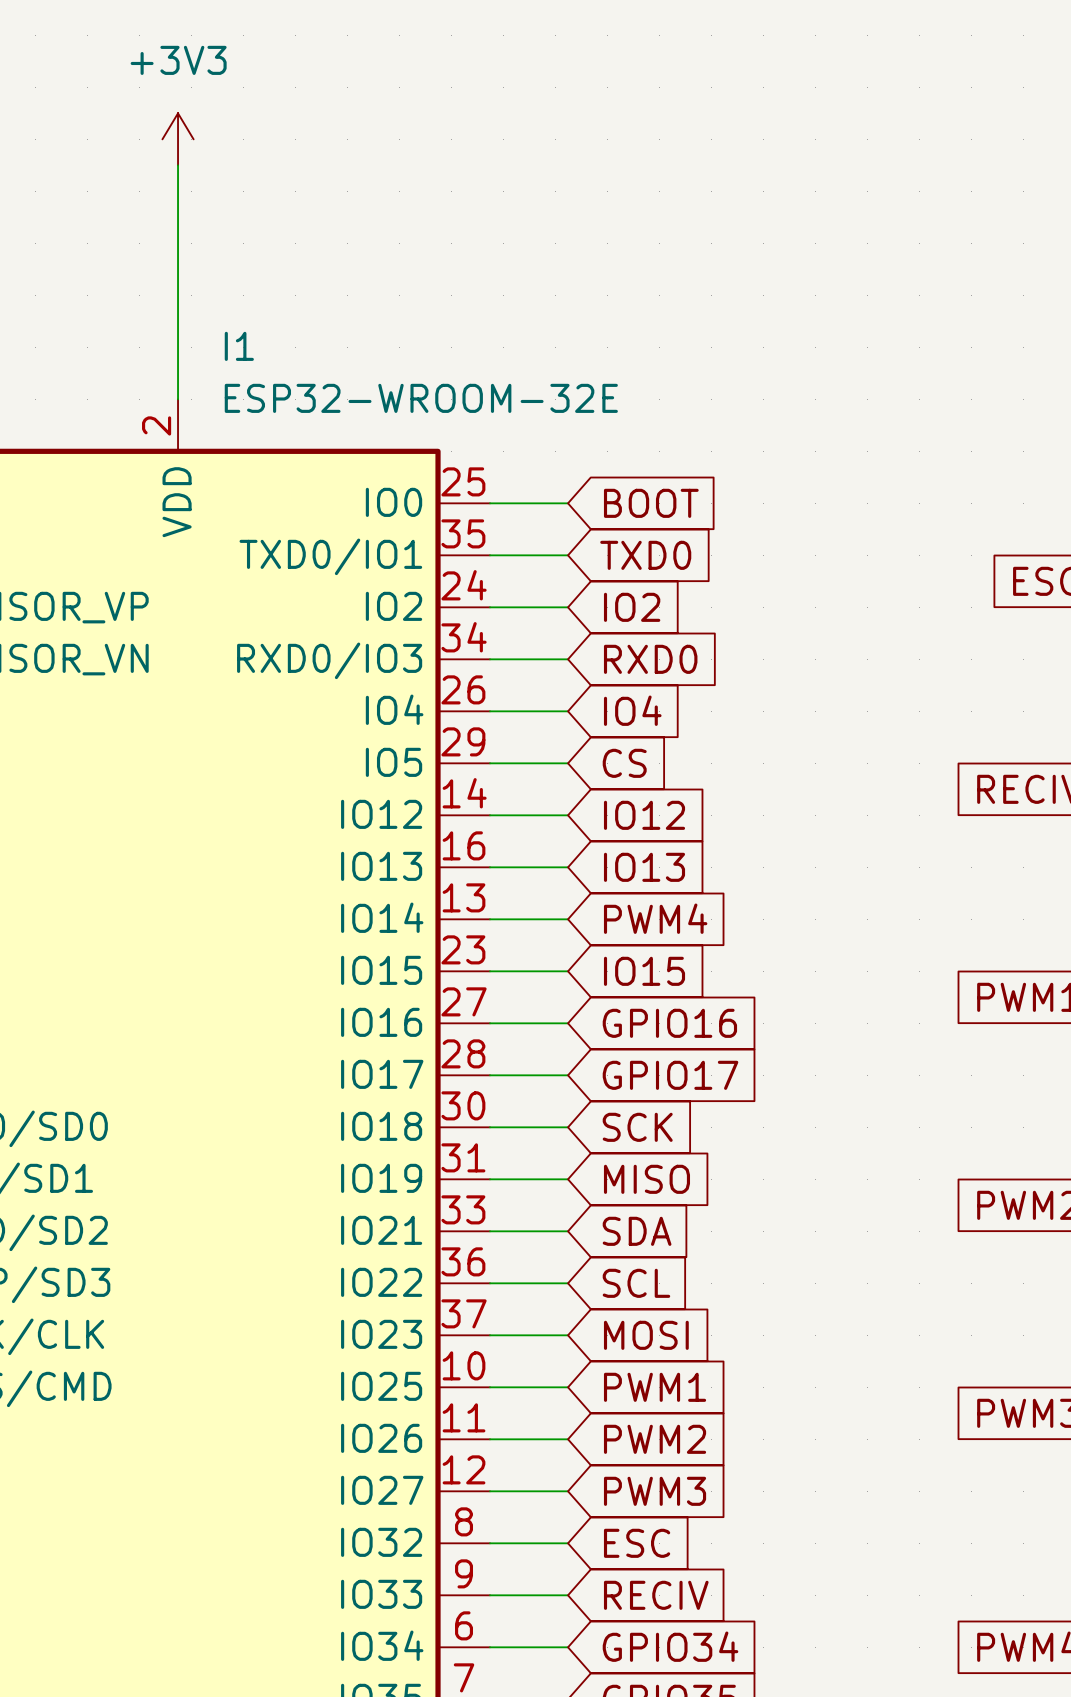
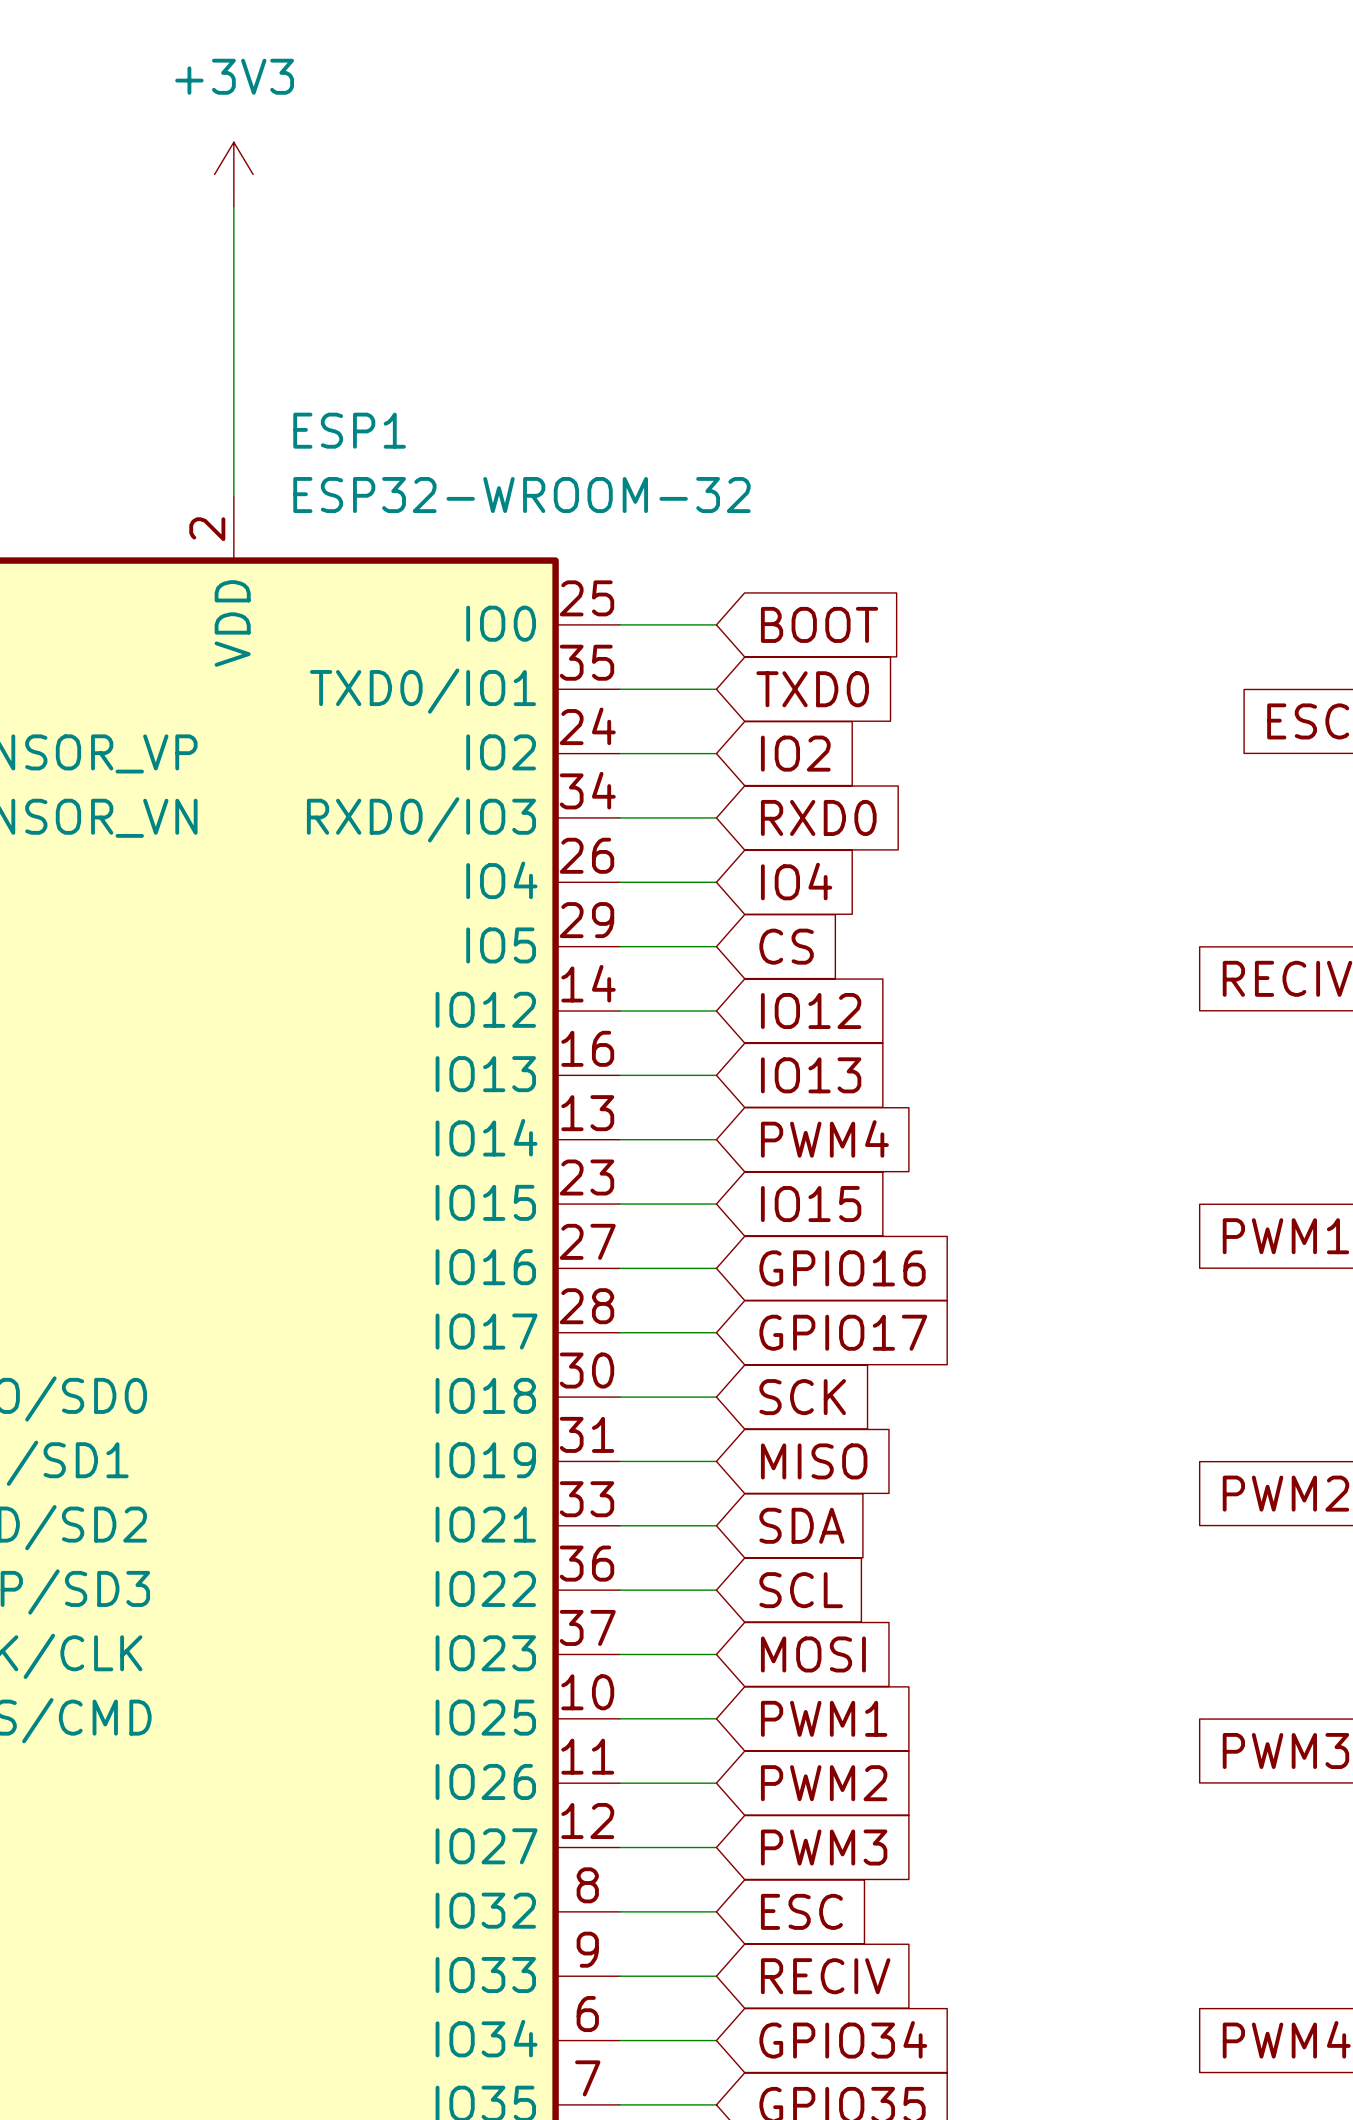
I1 name: I1 (239, 346) -> ESP1 (349, 430)
I1 value: ESP32-WROOM-32E (421, 398) -> ESP32-WROOM-32 (521, 495)

